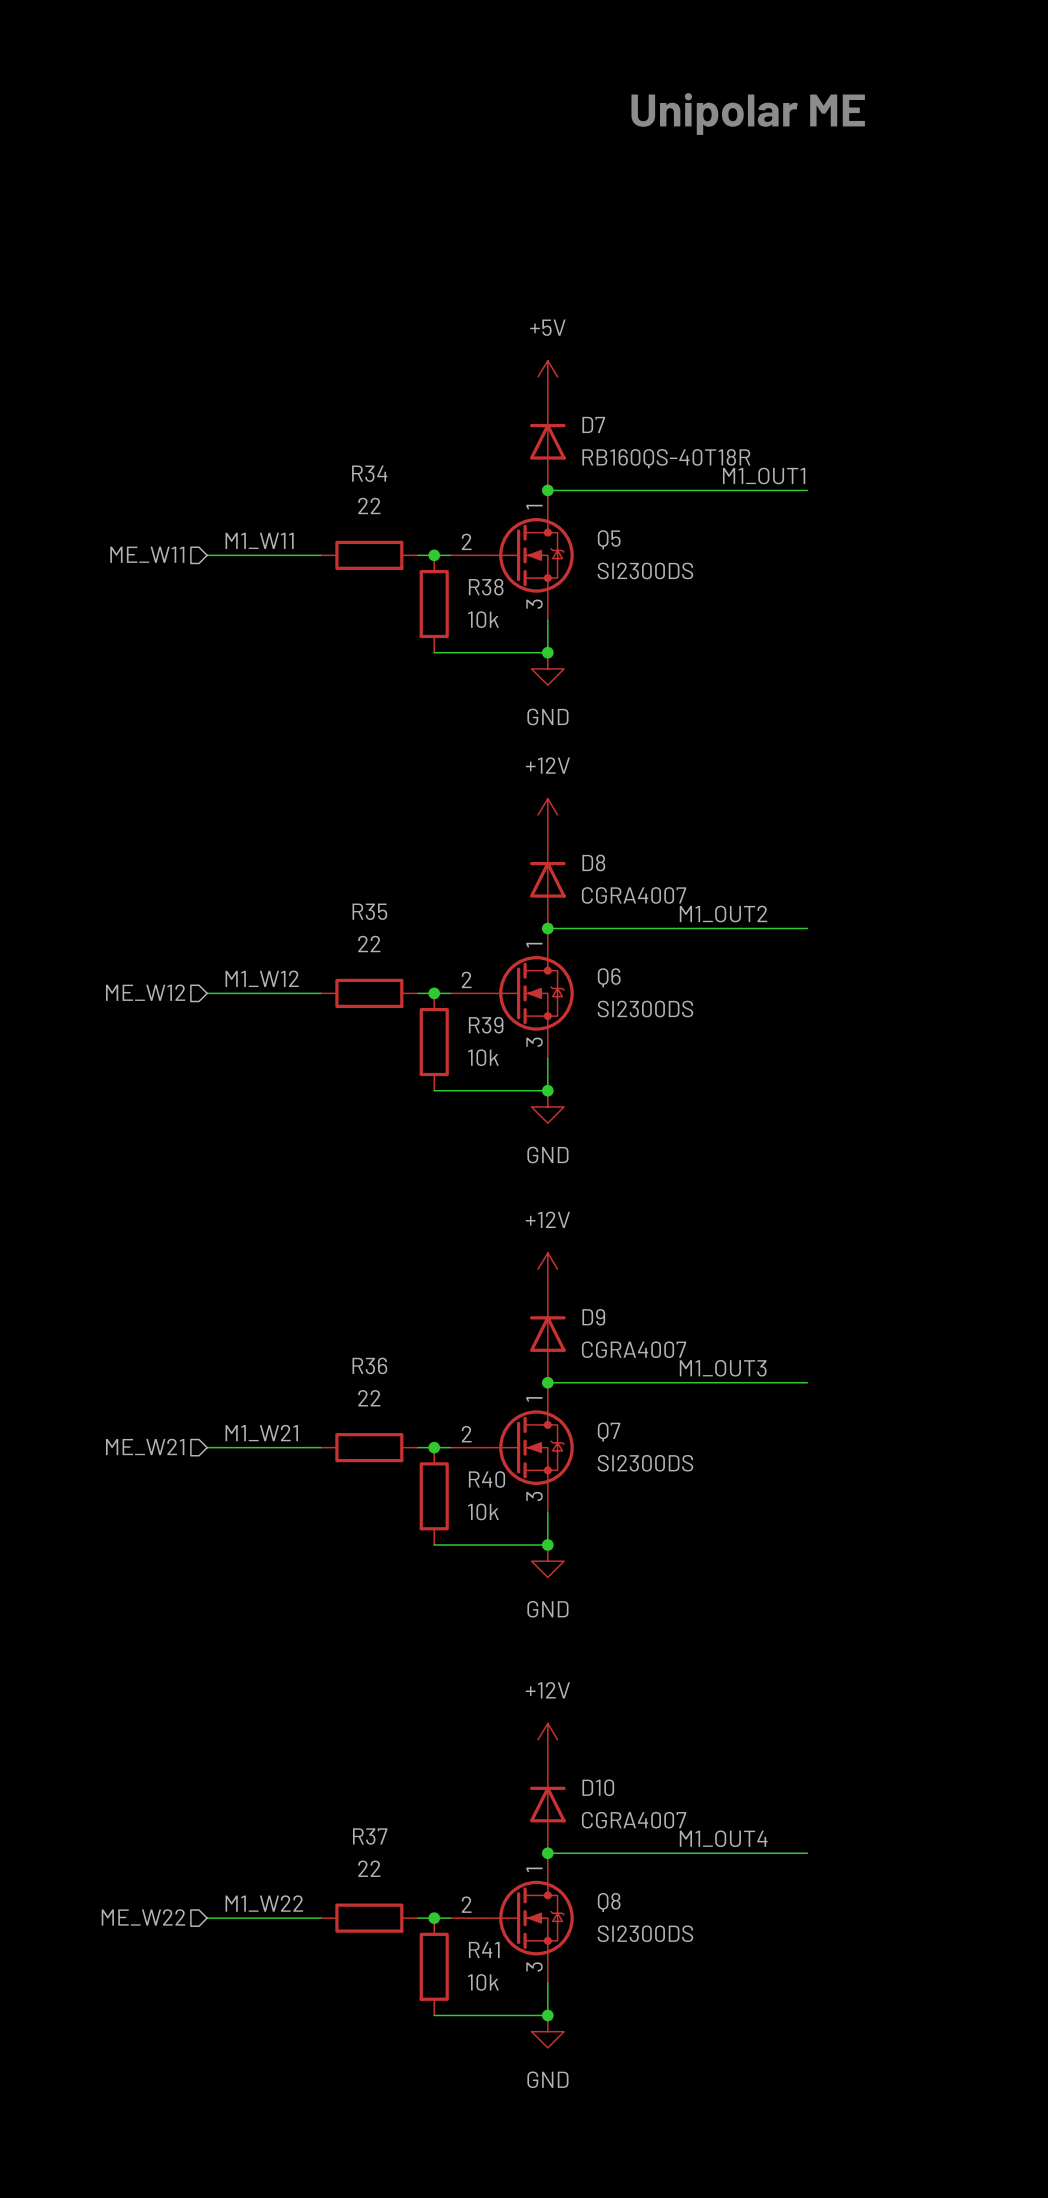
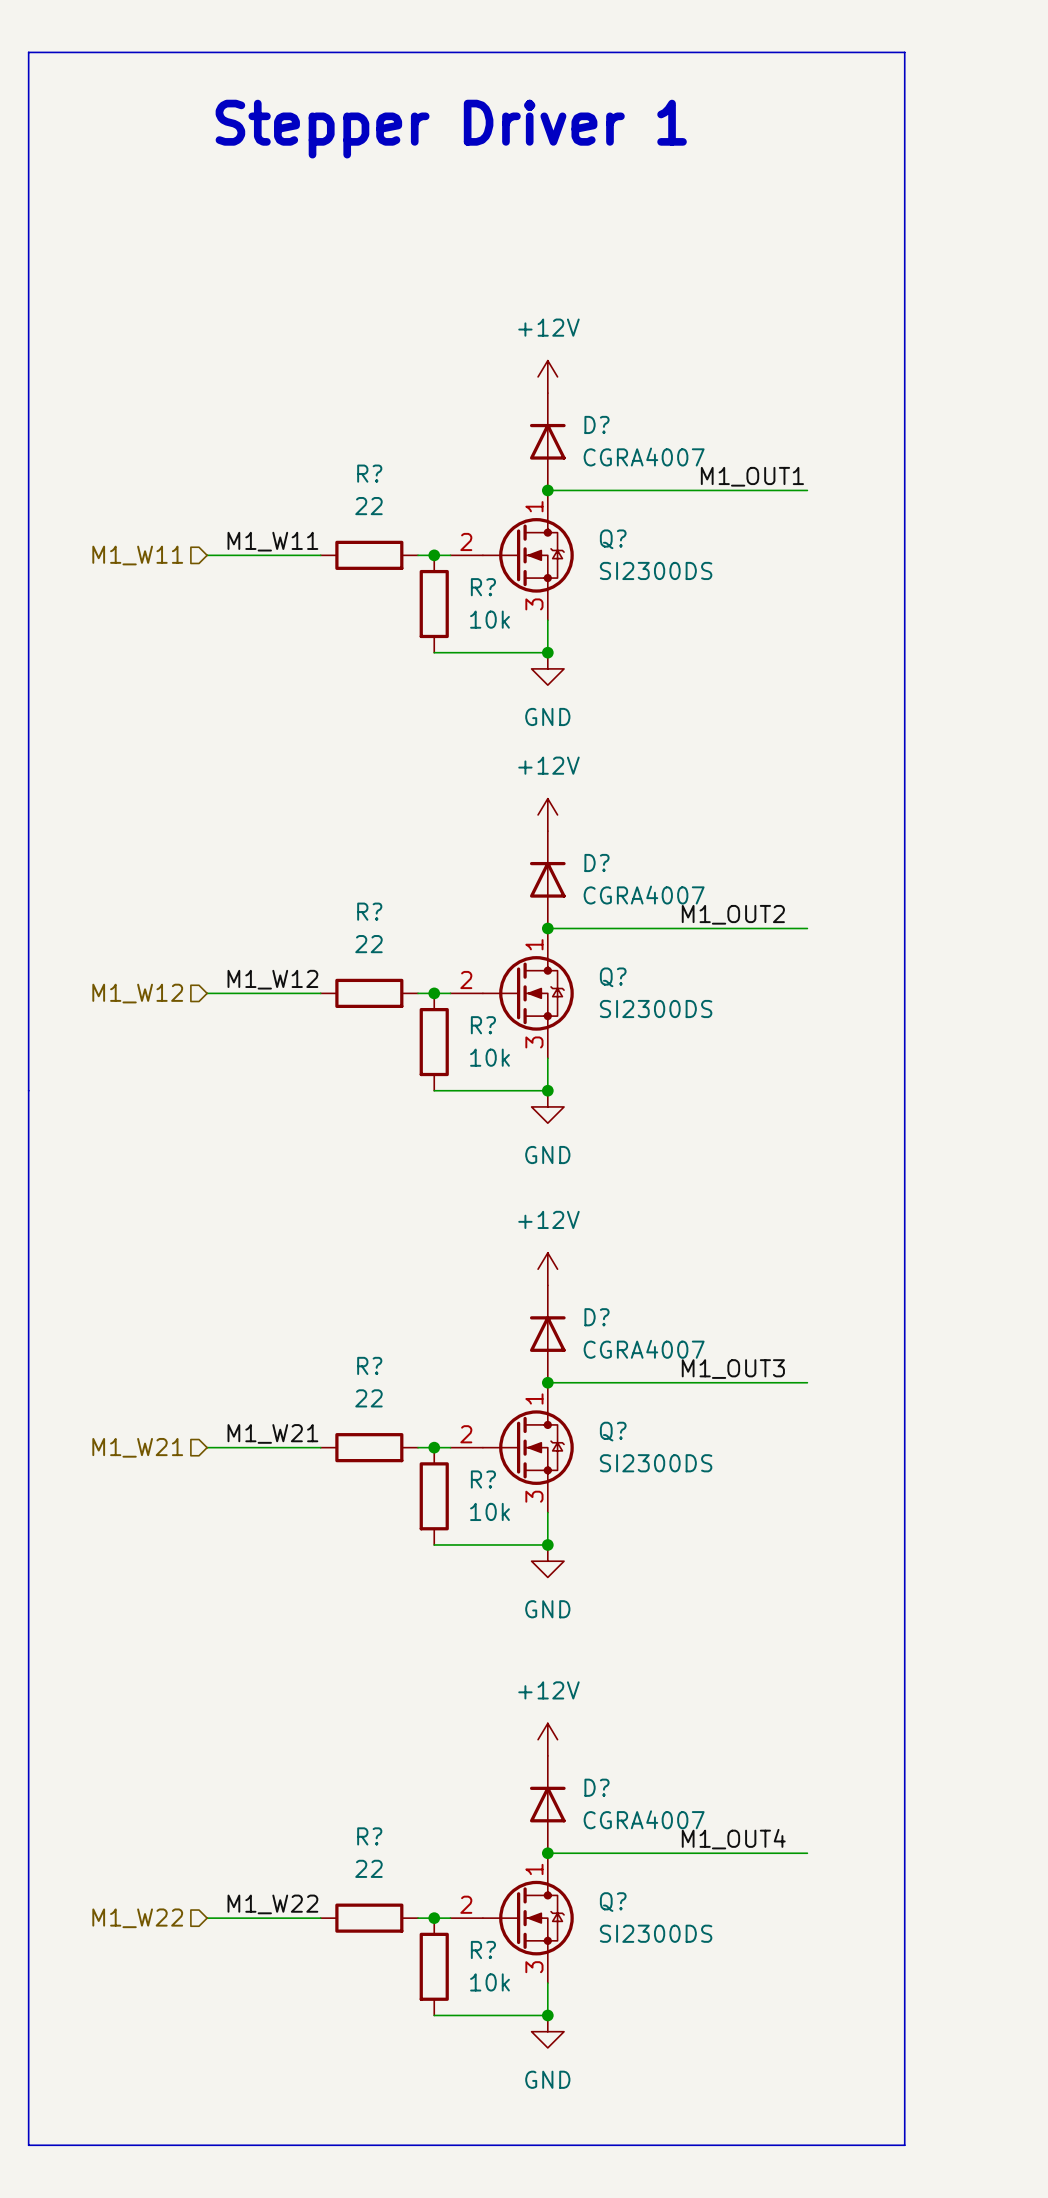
line: none -> (28, 52) (904, 52) (904, 2145) (28, 2145) (28, 52)
text: Unipolar ME (748, 114) -> none
text: none -> Stepper Driver 1 (451, 129)
power symbol: +5V (547, 376) -> +12V (547, 376)
D7 name: D7 (593, 424) -> D? (596, 424)
D7 value: RB160QS-40T18R (666, 458) -> CGRA4007 (644, 457)
R34 name: R34 (369, 473) -> R? (369, 473)
Q5 name: Q5 (609, 539) -> Q? (613, 539)
hierarchical label: ME_W11 (147, 554) -> M1_W11 (137, 555)
R38 name: R38 (486, 587) -> R? (483, 587)
D8 name: D8 (593, 862) -> D? (596, 862)
R35 name: R35 (369, 911) -> R? (369, 911)
Q6 name: Q6 (609, 977) -> Q? (613, 977)
hierarchical label: ME_W12 (145, 992) -> M1_W12 (137, 993)
R39 name: R39 (486, 1025) -> R? (483, 1025)
D9 name: D9 (593, 1317) -> D? (596, 1317)
R36 name: R36 (369, 1365) -> R? (369, 1365)
Q7 name: Q7 (609, 1432) -> Q? (613, 1431)
hierarchical label: ME_W21 (145, 1446) -> M1_W21 (137, 1447)
R40 name: R40 (486, 1479) -> R? (483, 1479)
D10 name: D10 (598, 1787) -> D? (596, 1787)
R37 name: R37 (370, 1836) -> R? (369, 1836)
Q8 name: Q8 (609, 1902) -> Q? (613, 1902)
hierarchical label: ME_W22 (143, 1917) -> M1_W22 (137, 1918)
R41 name: R41 (484, 1949) -> R? (483, 1949)

